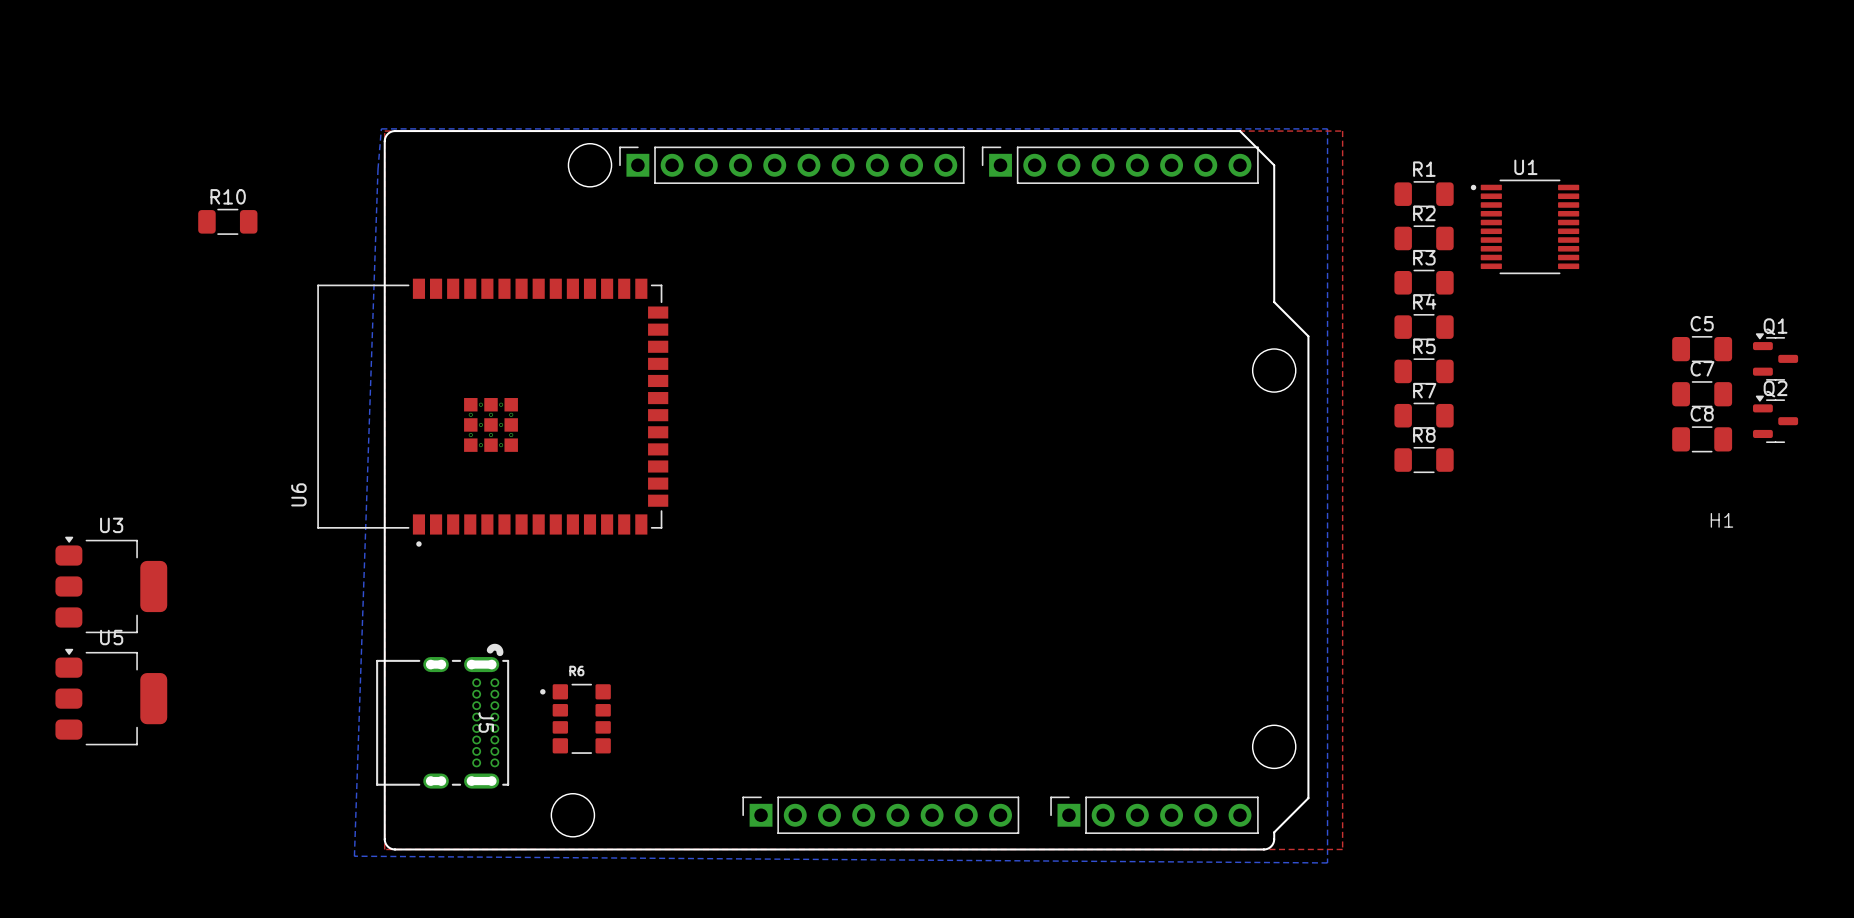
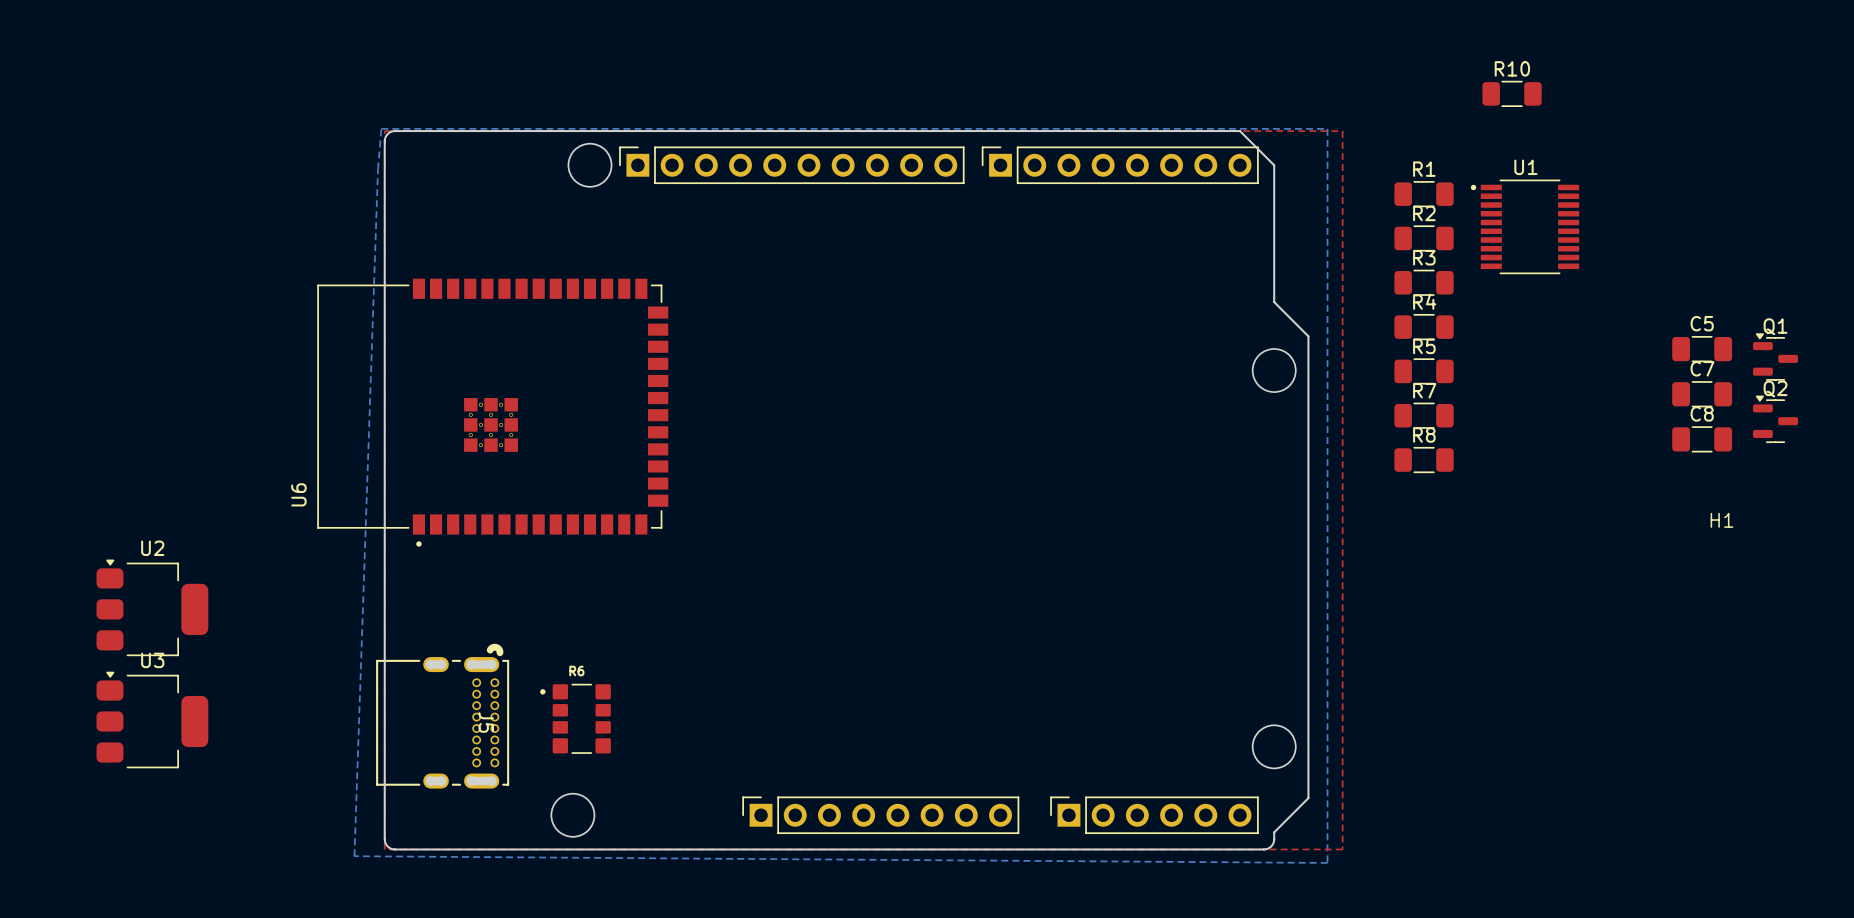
R10 position: (227, 221) -> (1512, 93)
U3 position: (111, 584) -> (152, 719)
U2: none -> (152, 607)
U5: (111, 697) -> none

